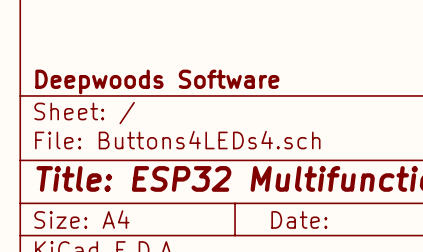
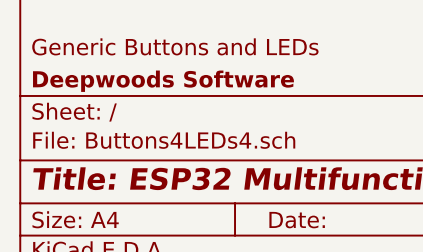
title block: none -> Generic Buttons and LEDs (175, 46)

